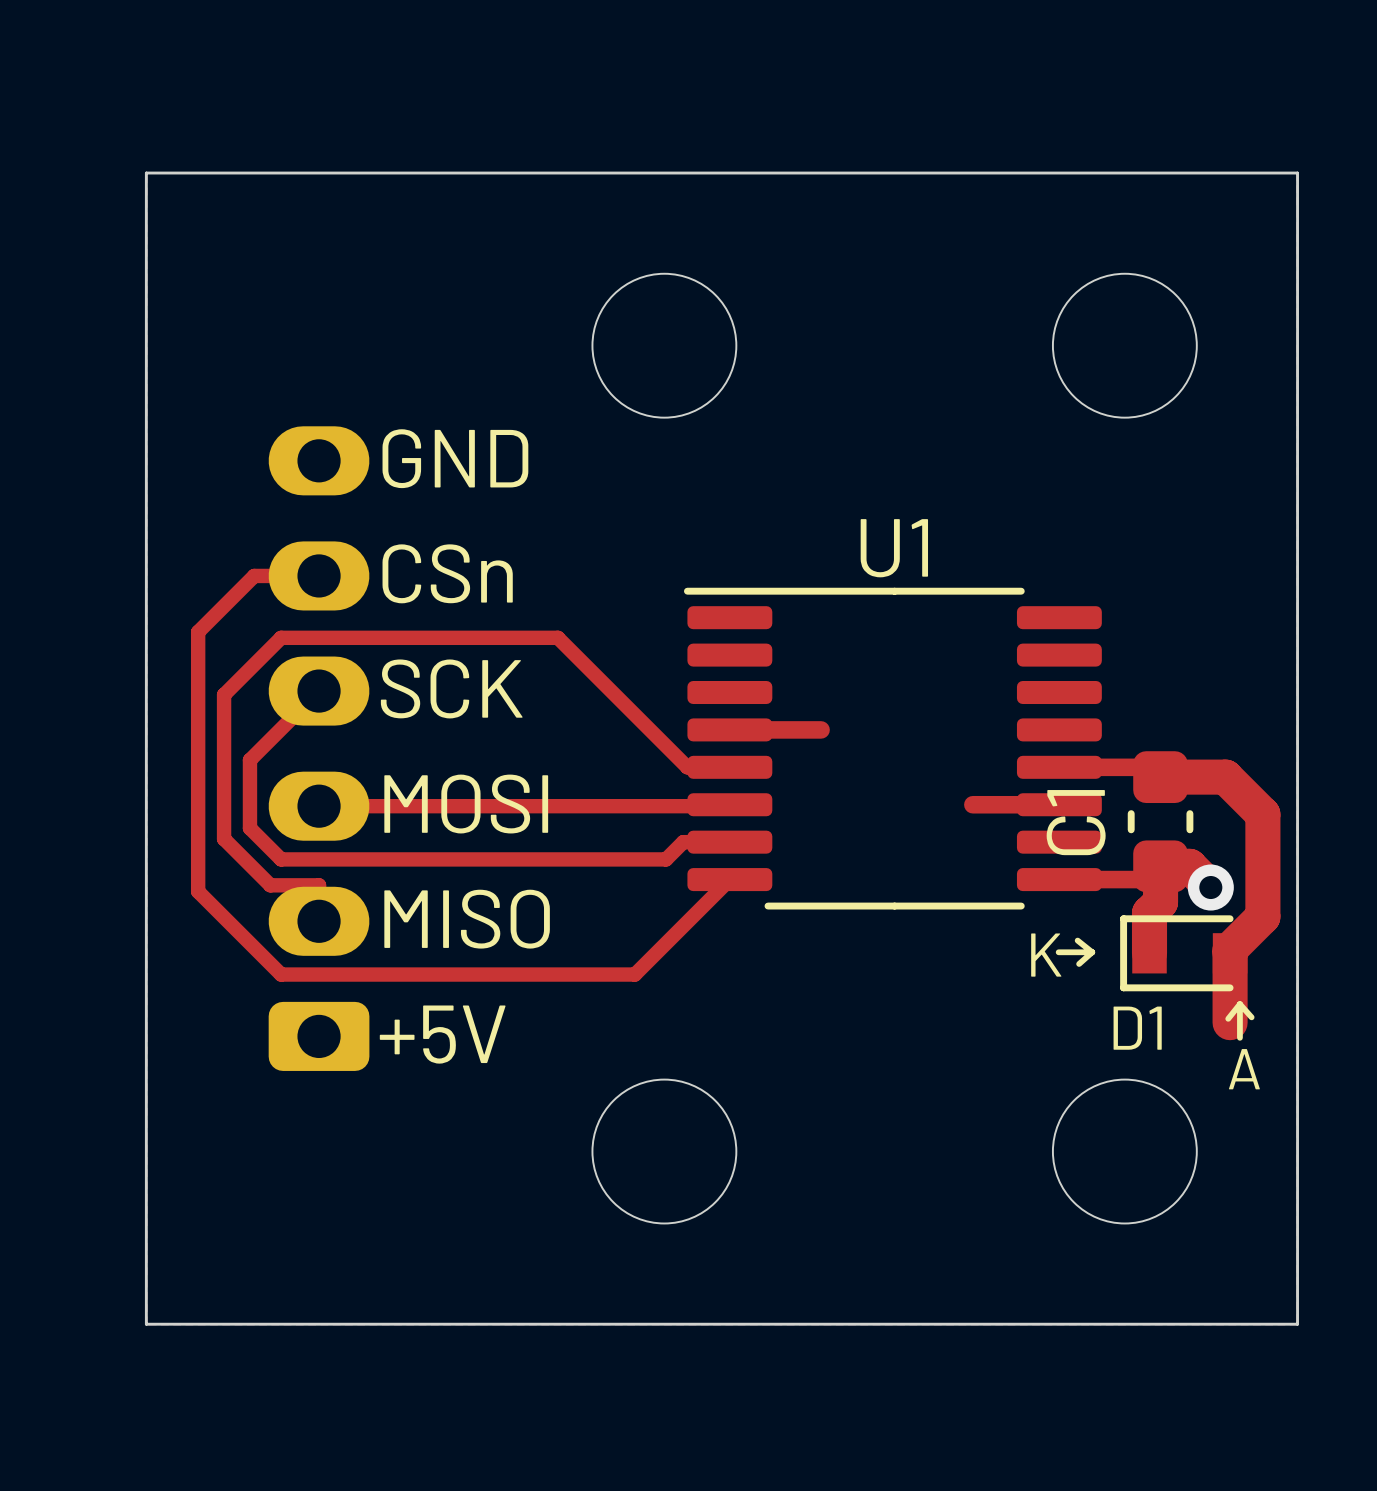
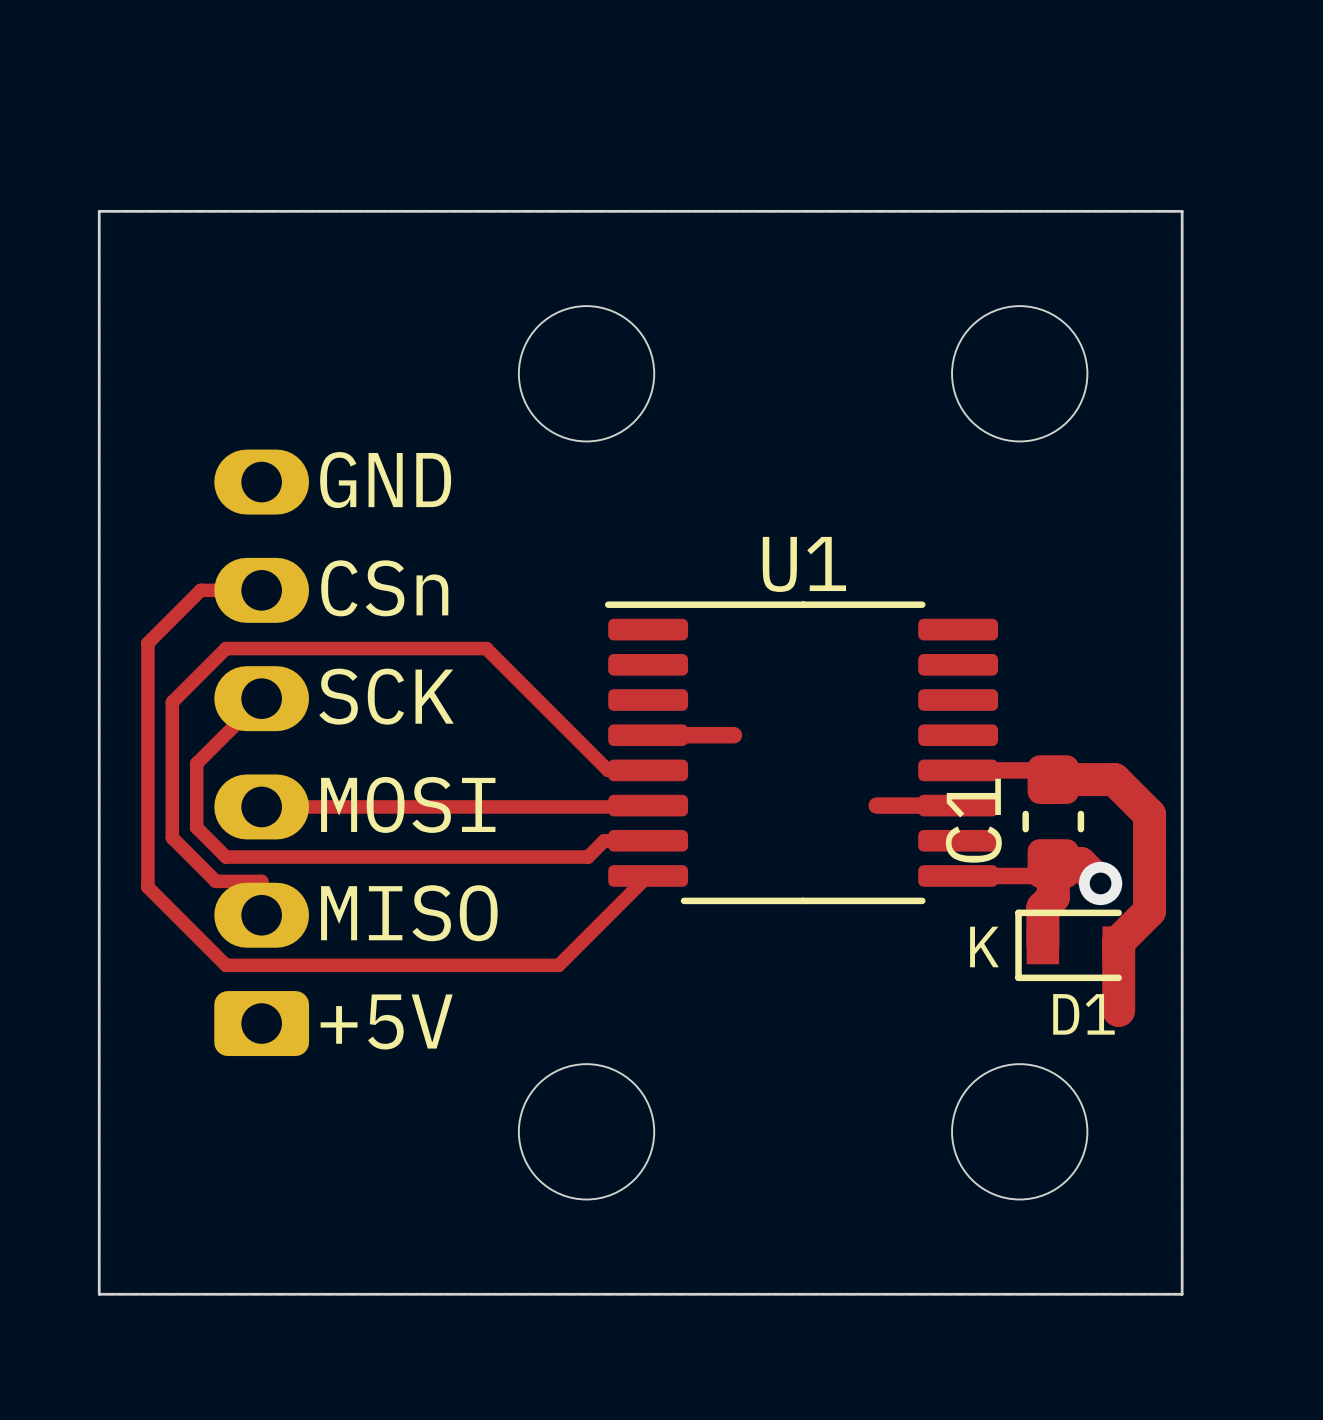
line: (1077, 940) (1092, 952) -> none
line: (1058, 952) (1092, 952) -> none
line: (1092, 952) (1079, 963) -> none
text position: K (1046, 955) -> K (984, 946)
line: (1239, 1004) (1228, 1018) -> none
line: (1239, 1004) (1251, 1017) -> none
line: (1239, 1004) (1239, 1037) -> none
D1 name position: D1 (1137, 1028) -> D1 (1083, 1014)
text: A (1244, 1069) -> none

